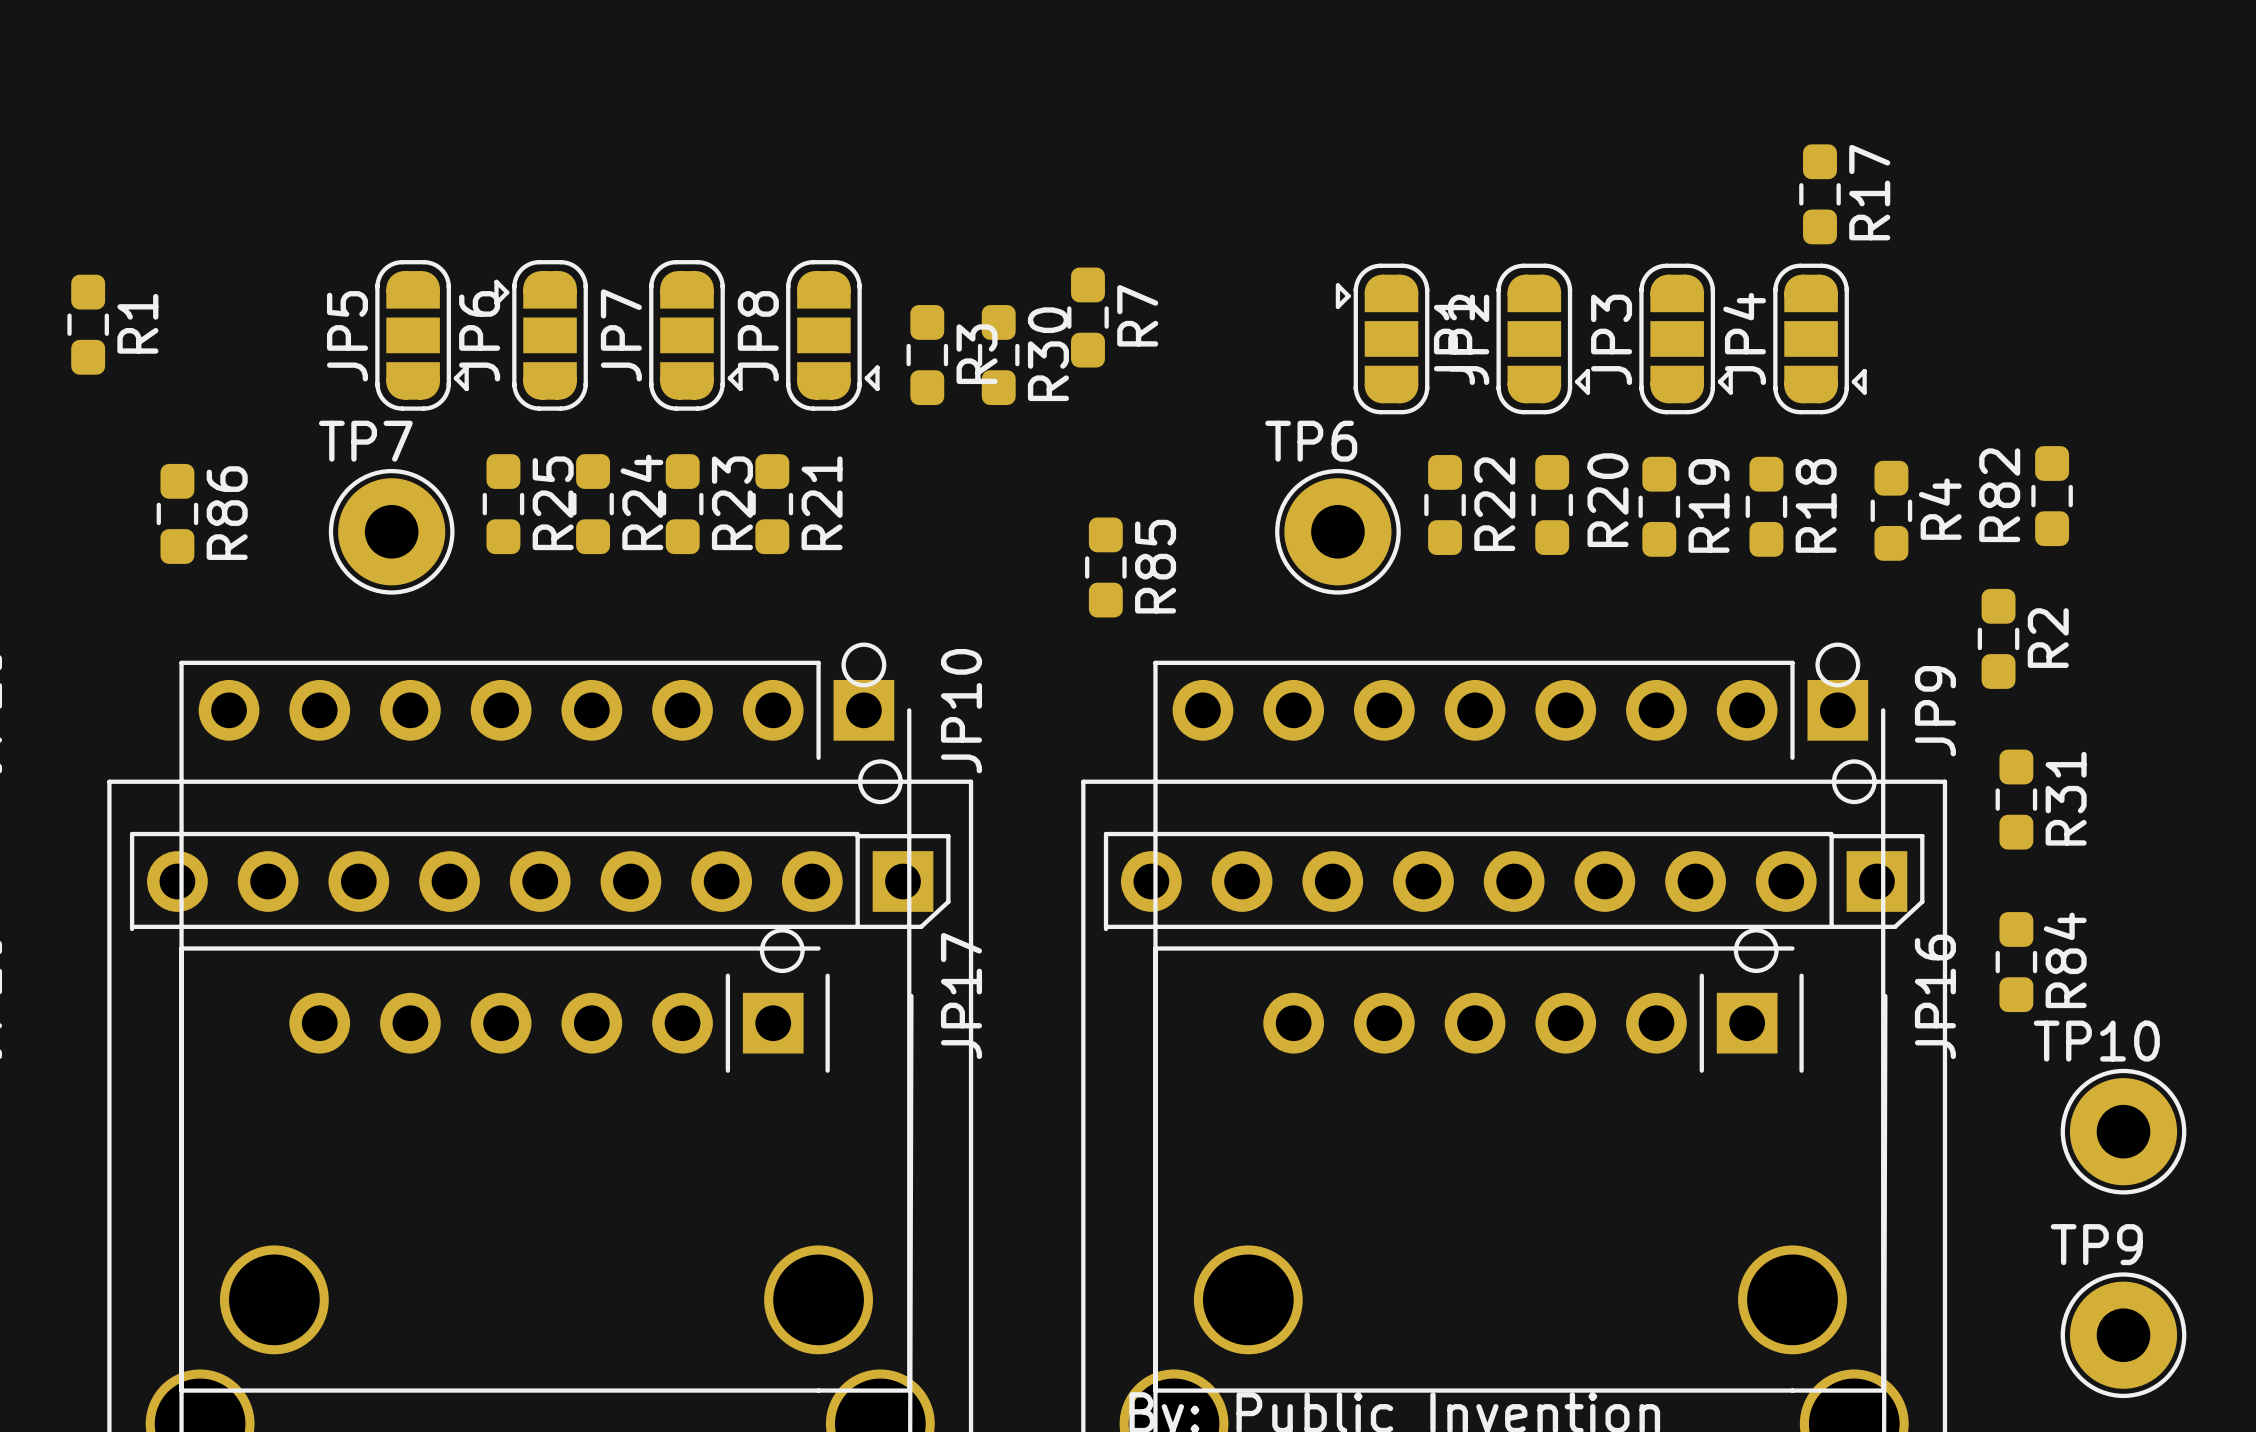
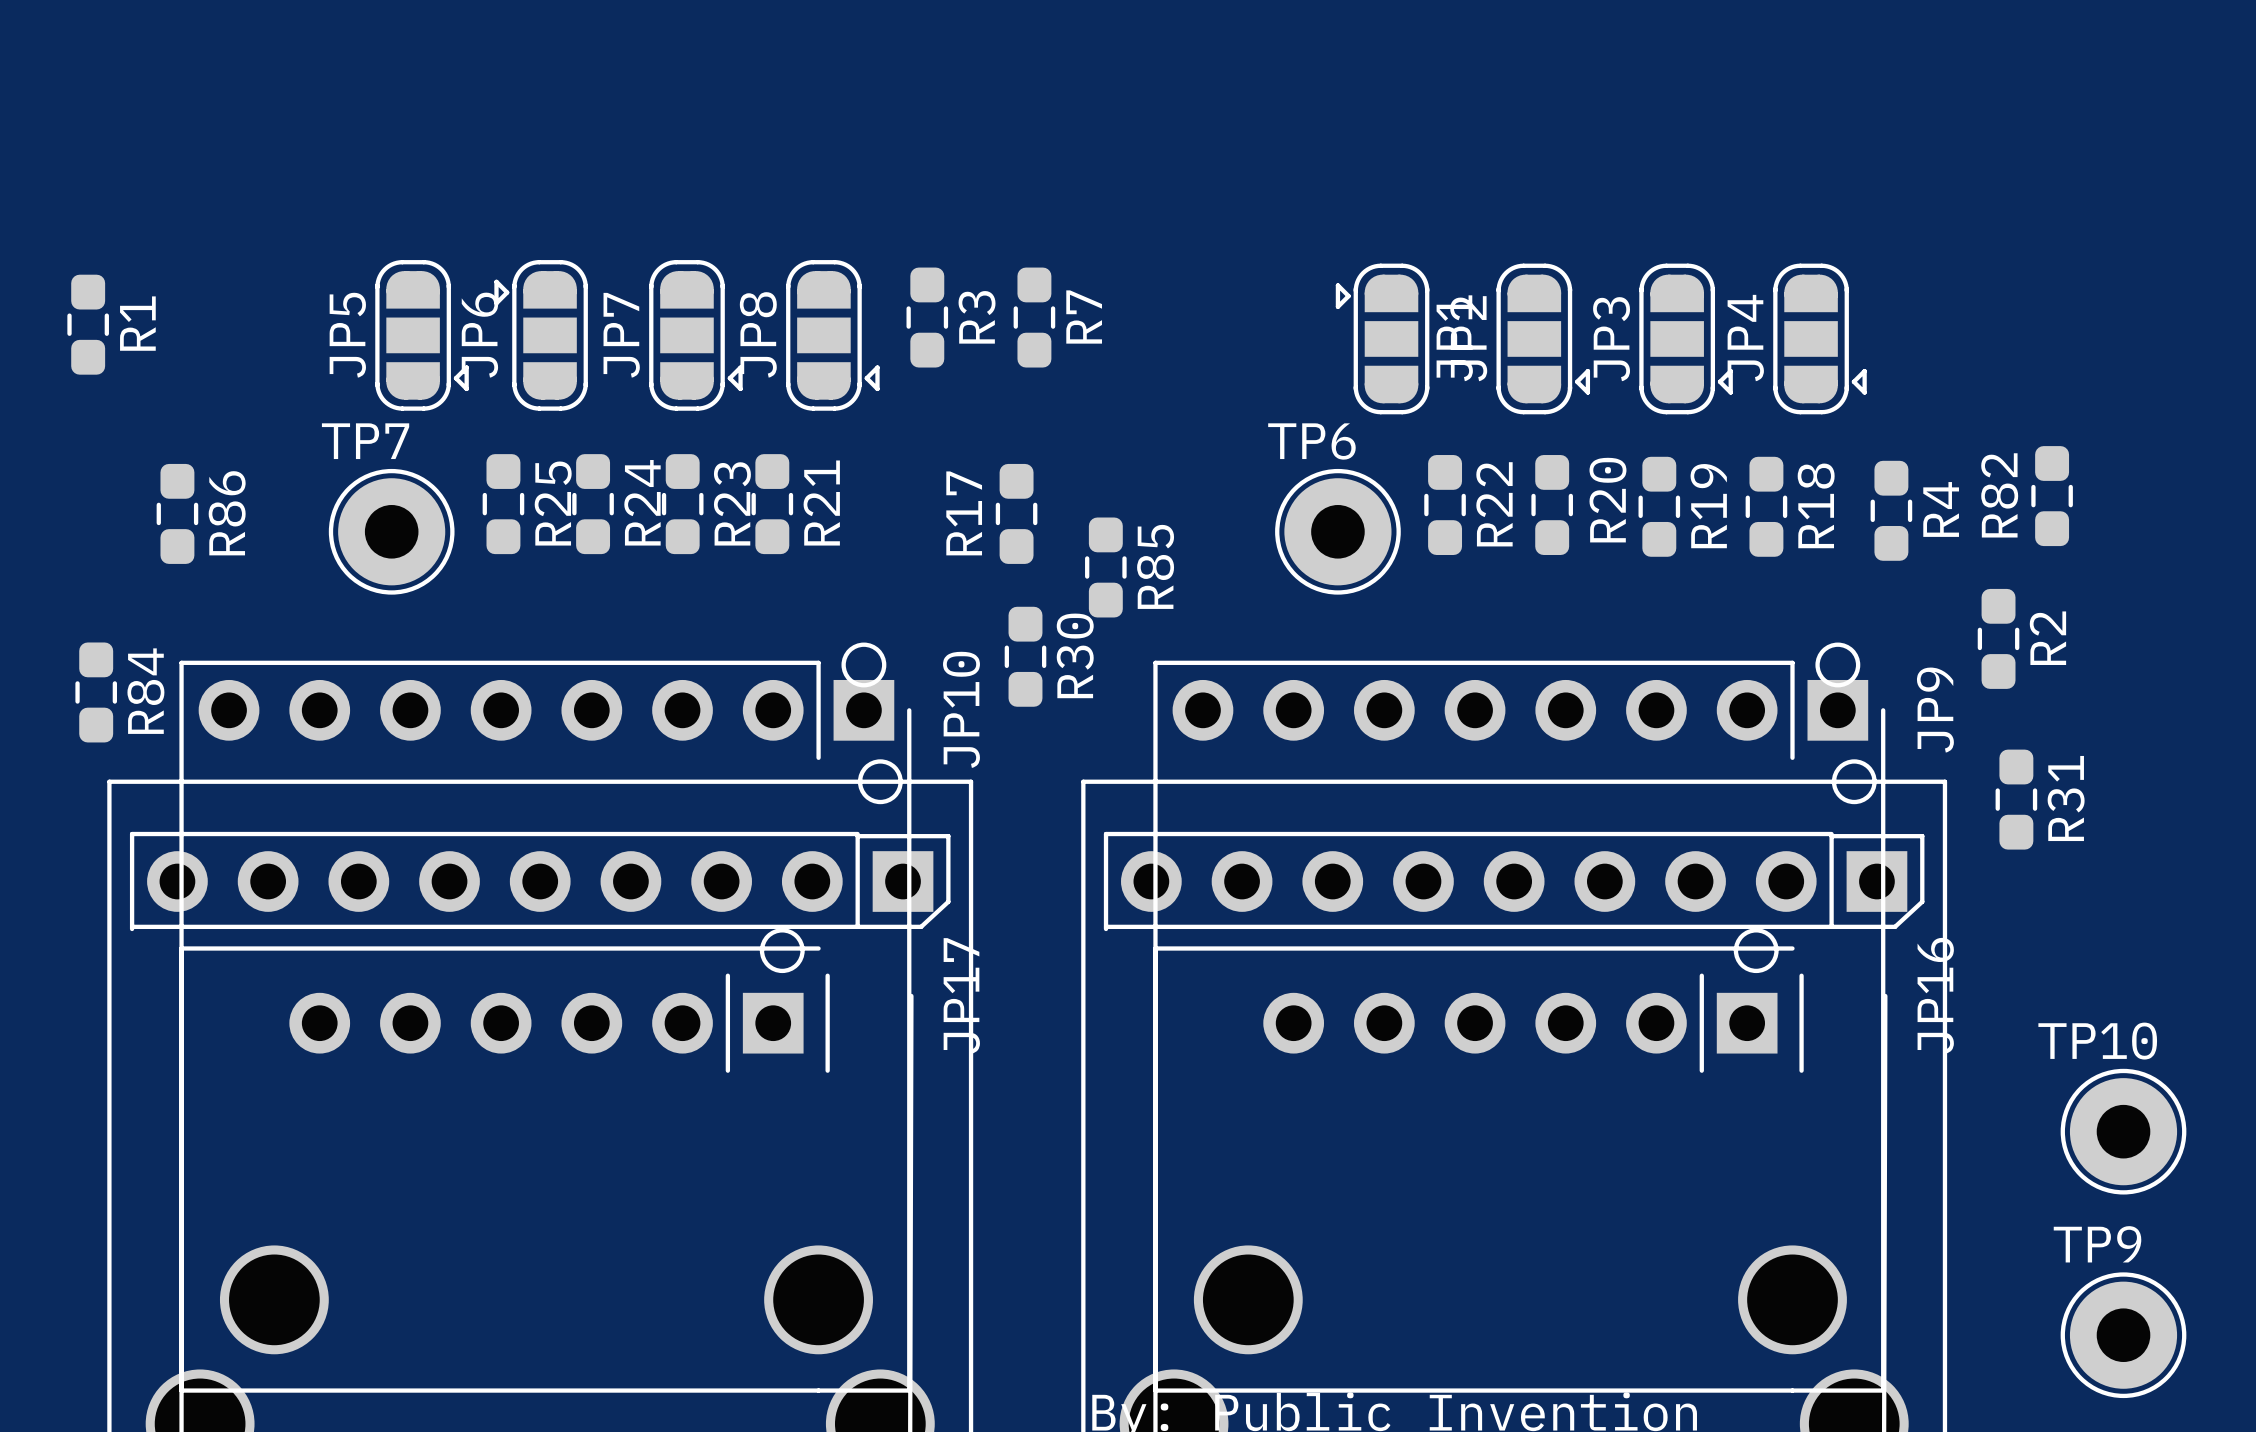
R17 name position: R17 (1869, 192) -> R17 (964, 513)
R17 position: (1819, 194) -> (1016, 513)
R7 position: (1087, 317) -> (1034, 317)
R3 position: (927, 355) -> (927, 317)
R30 position: (998, 355) -> (1025, 656)
R84 position: (2016, 962) -> (96, 692)

